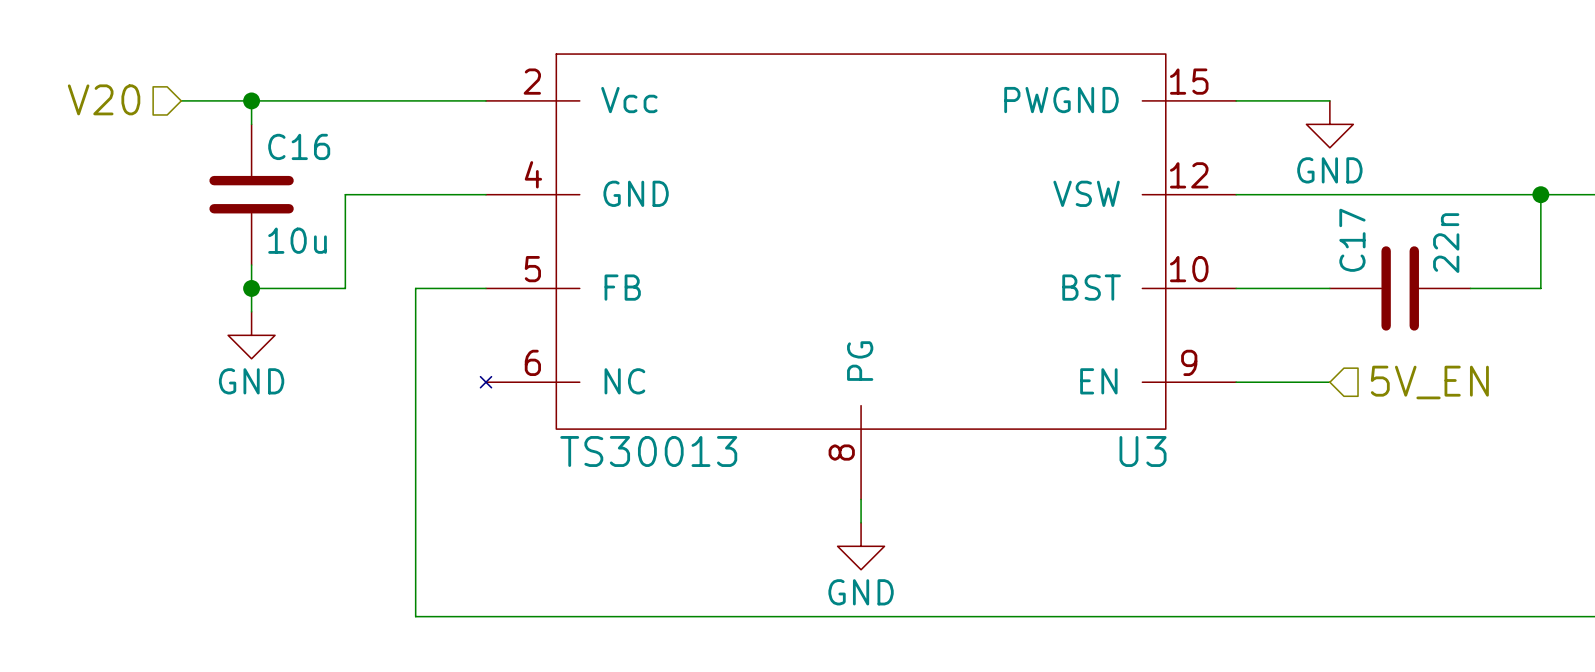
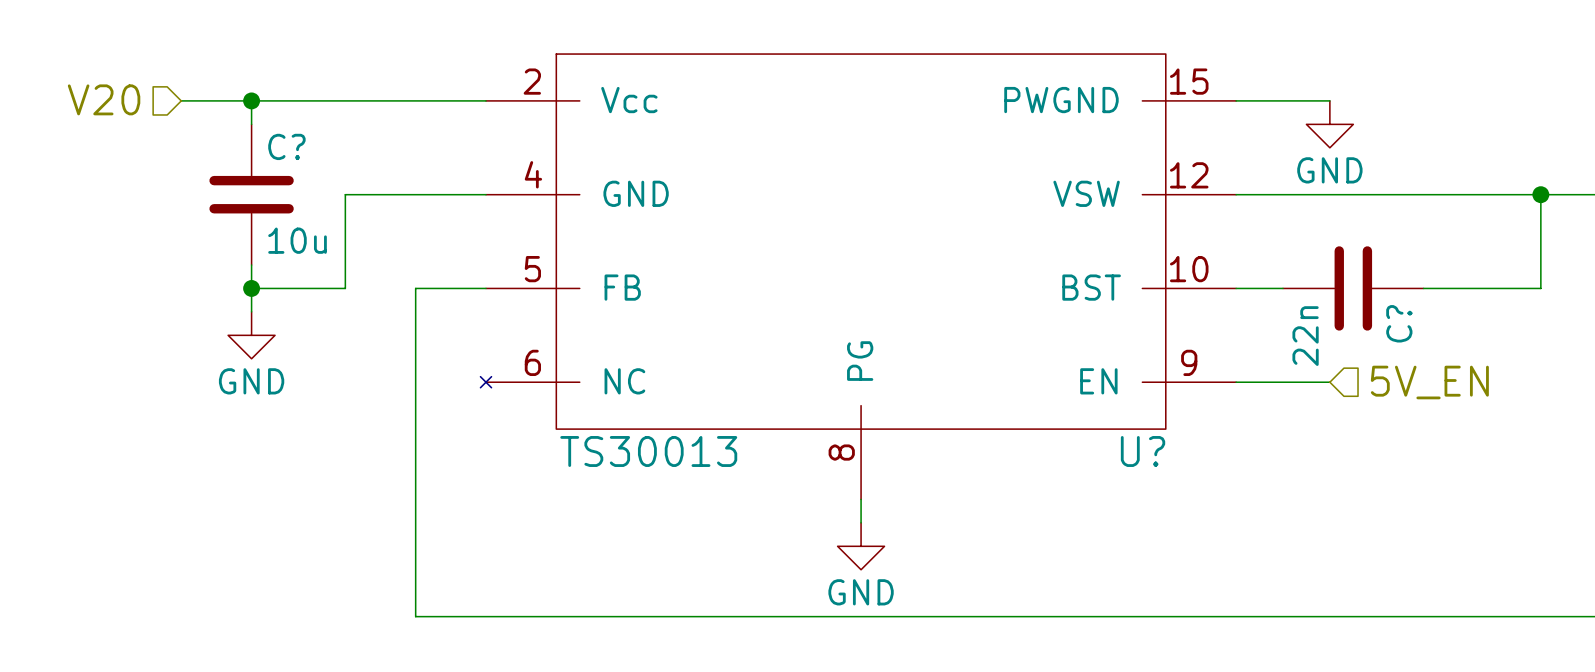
C16 name: C16 (299, 146) -> C? (286, 146)
C?: none -> 22n (1353, 288)
C17: 22n (1400, 288) -> none
U3 name: U3 (1143, 451) -> U? (1143, 451)

